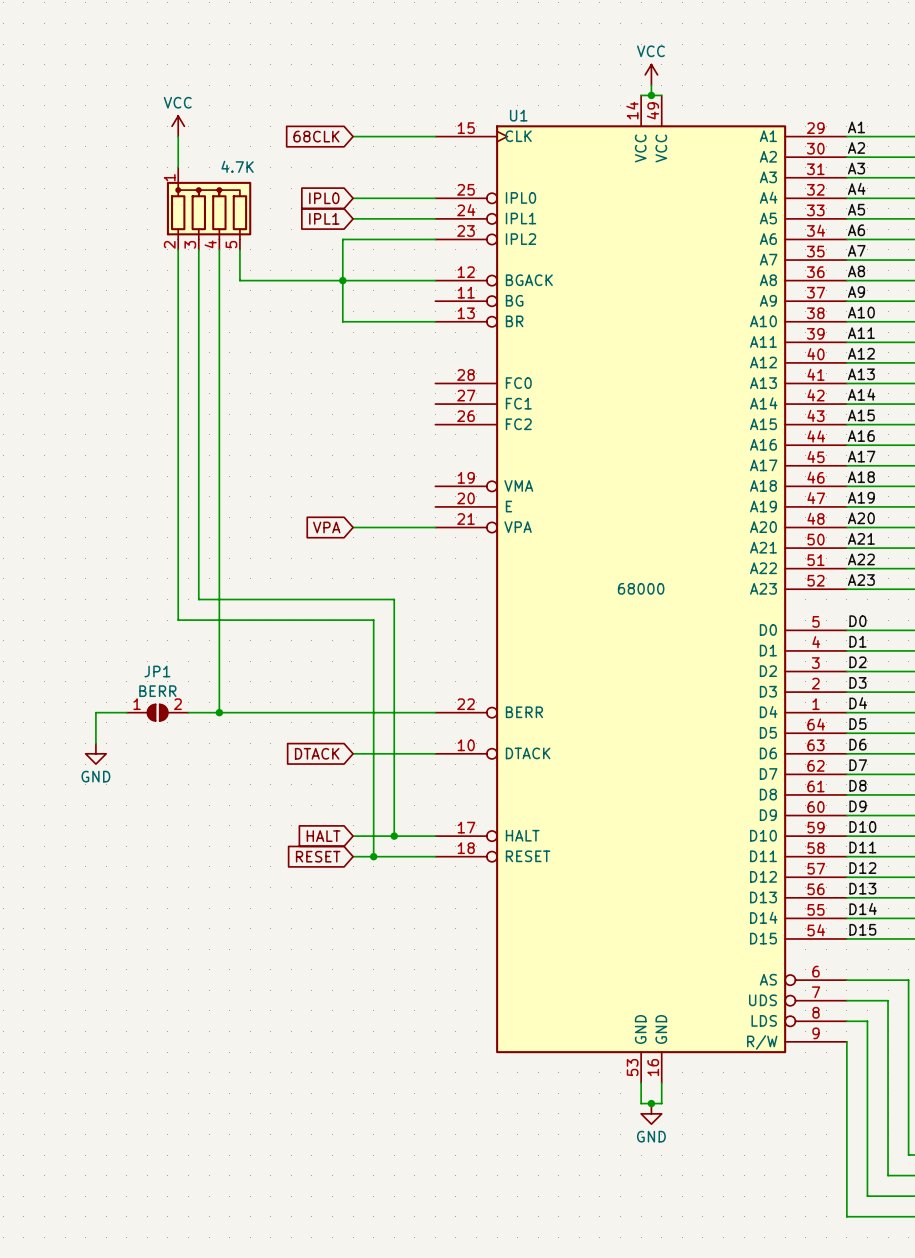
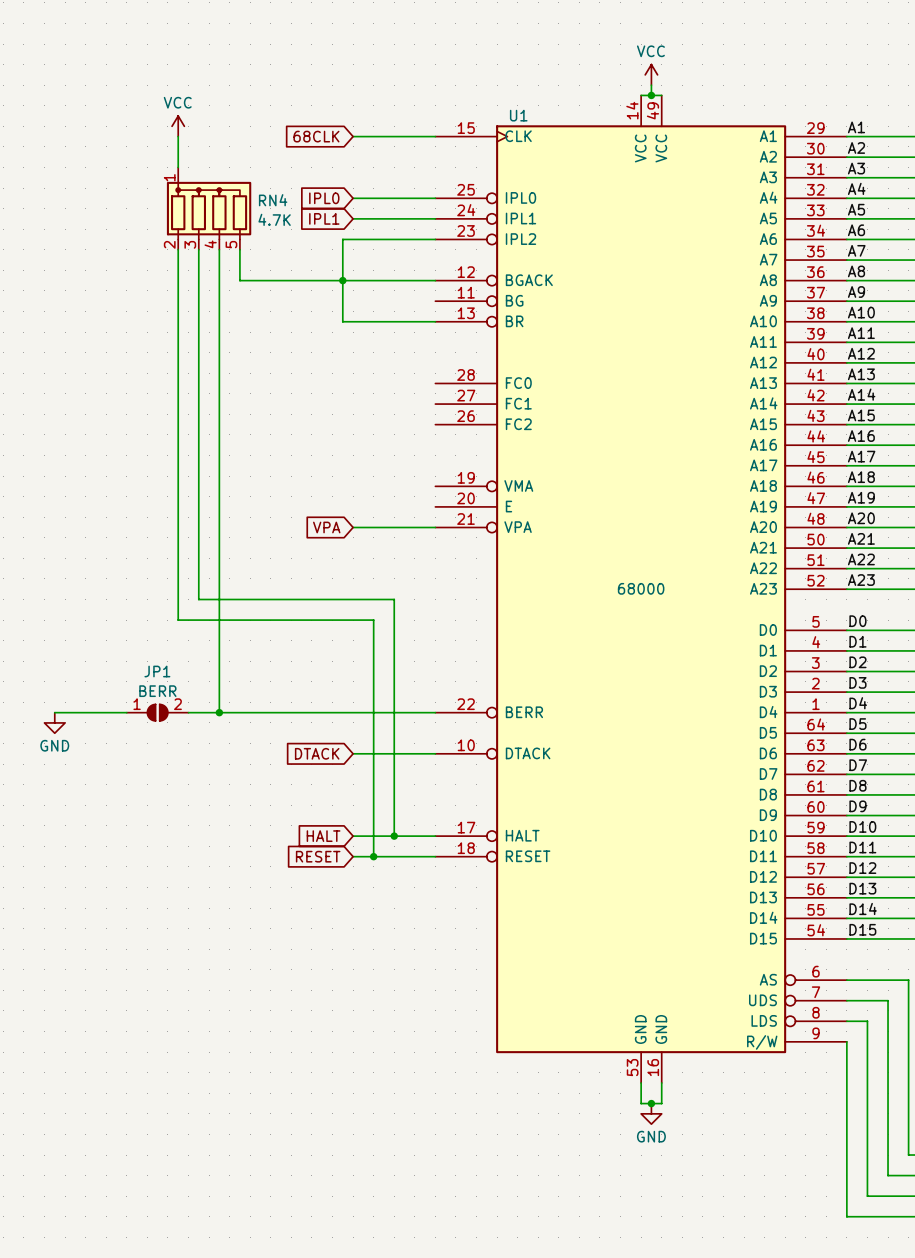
RN4 value position: 4.7K (237, 166) -> 4.7K (274, 219)
RN4 name: none -> RN4 (273, 200)
wire: (95, 712) (95, 743) -> (95, 712) (54, 712)
power symbol position: GND (95, 753) -> GND (54, 722)

